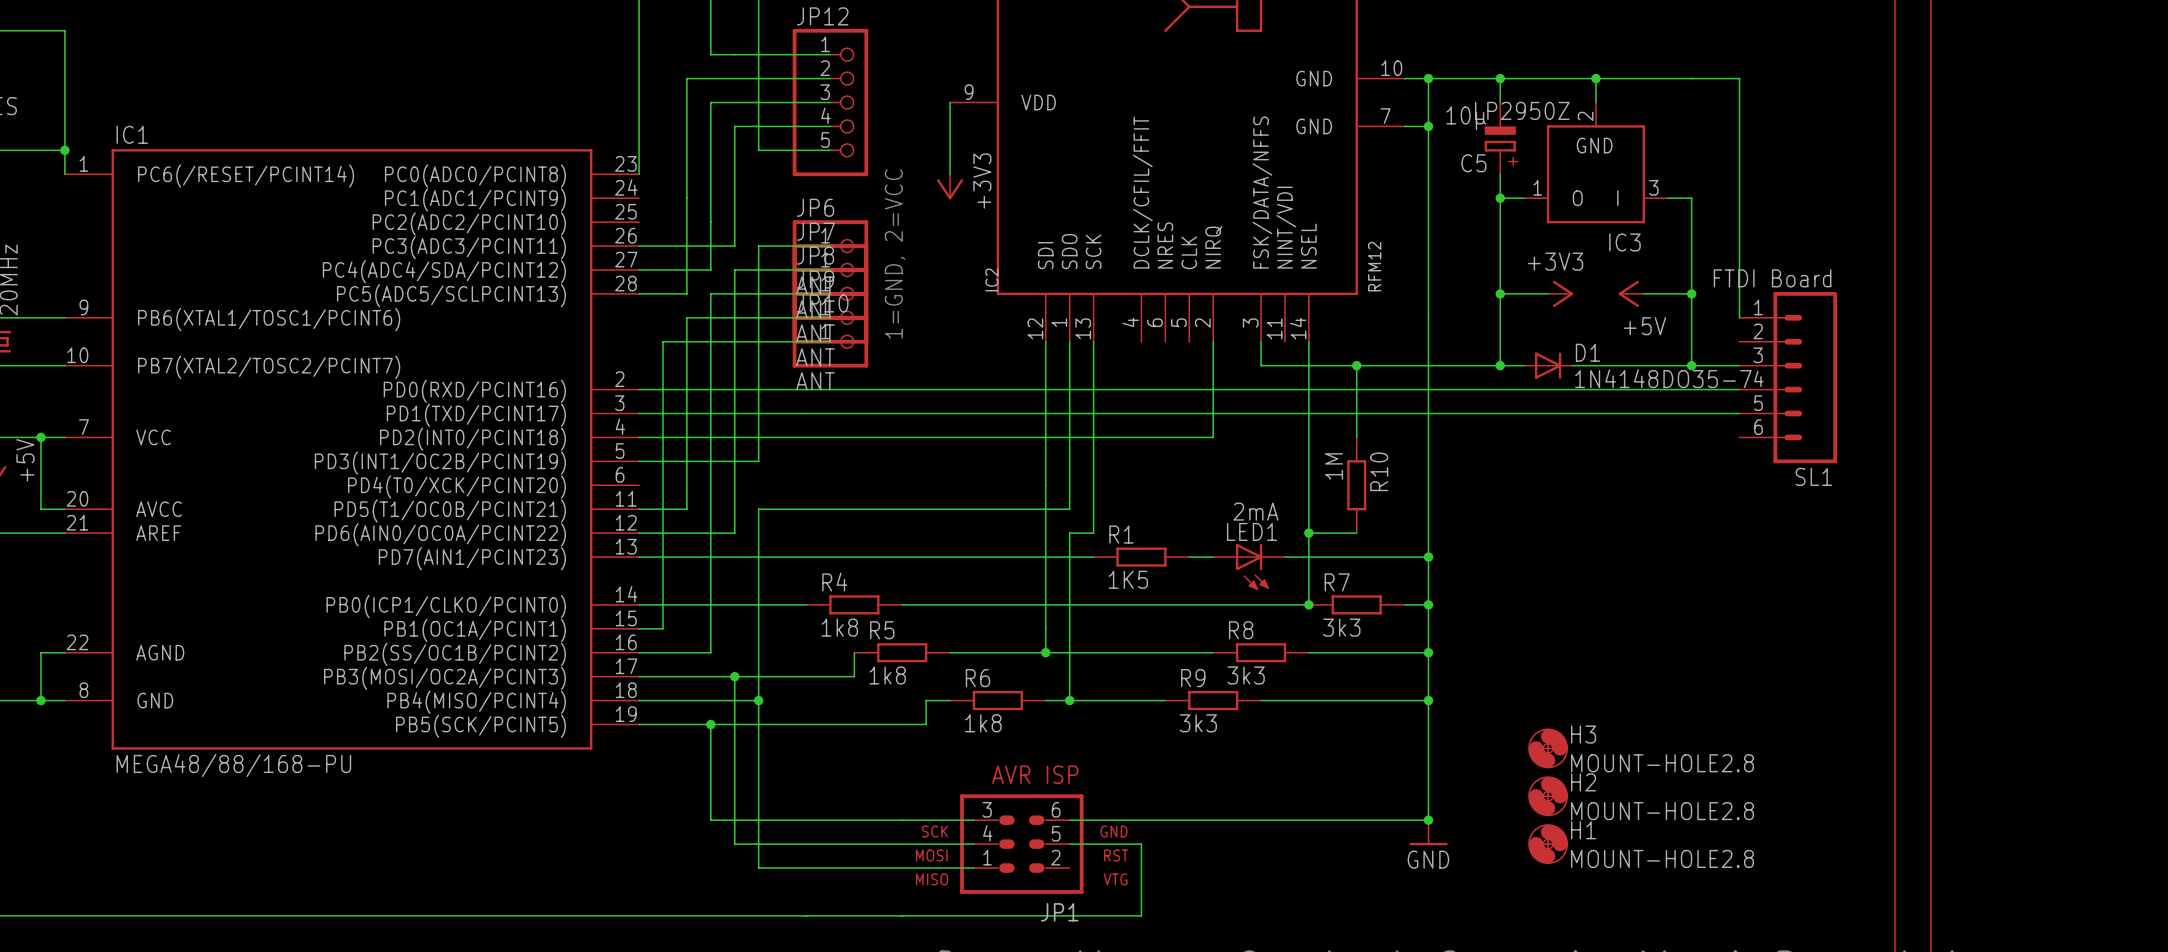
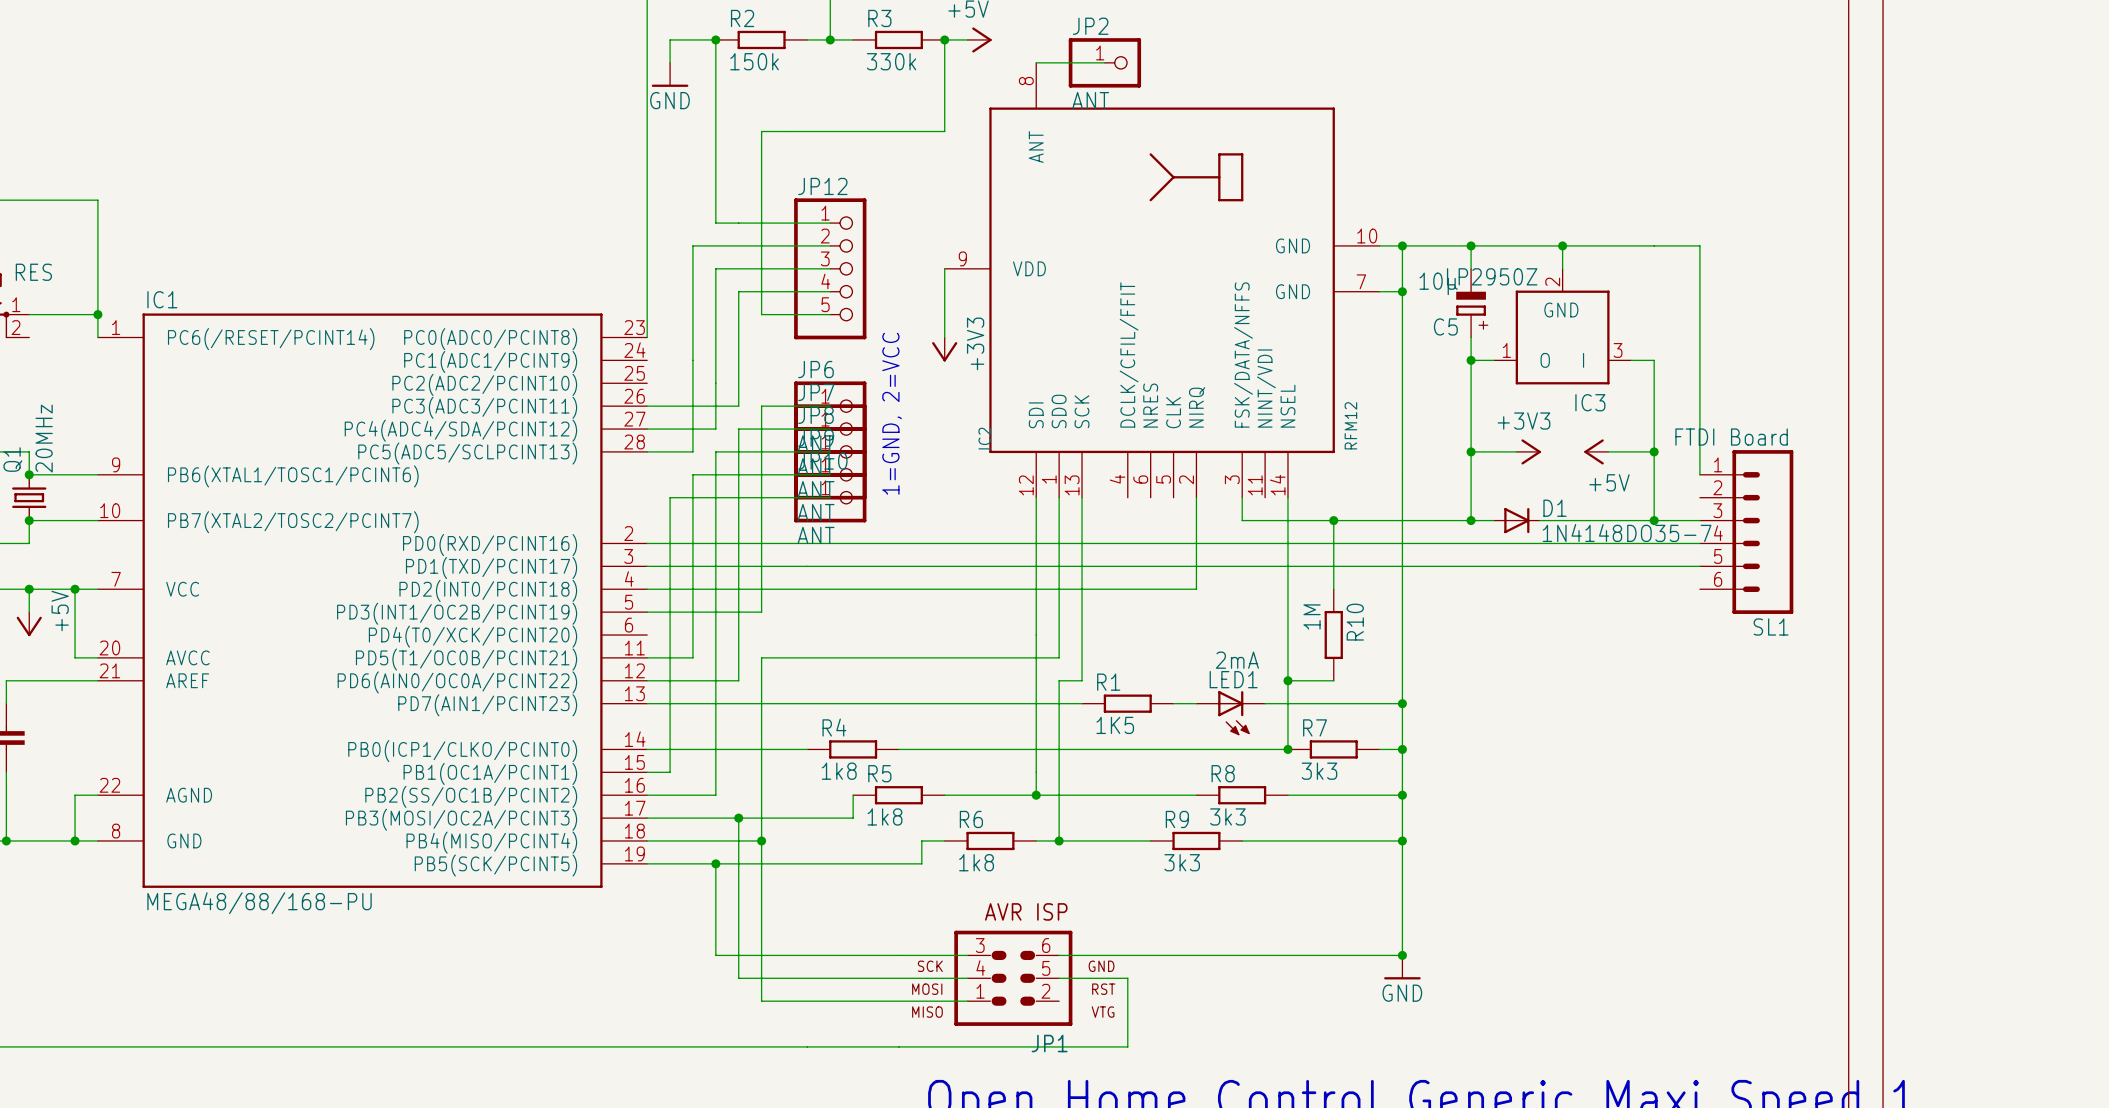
H3: MOUNT-HOLE2.8 (1548, 748) -> none
H2: MOUNT-HOLE2.8 (1548, 796) -> none
H1: MOUNT-HOLE2.8 (1548, 844) -> none

